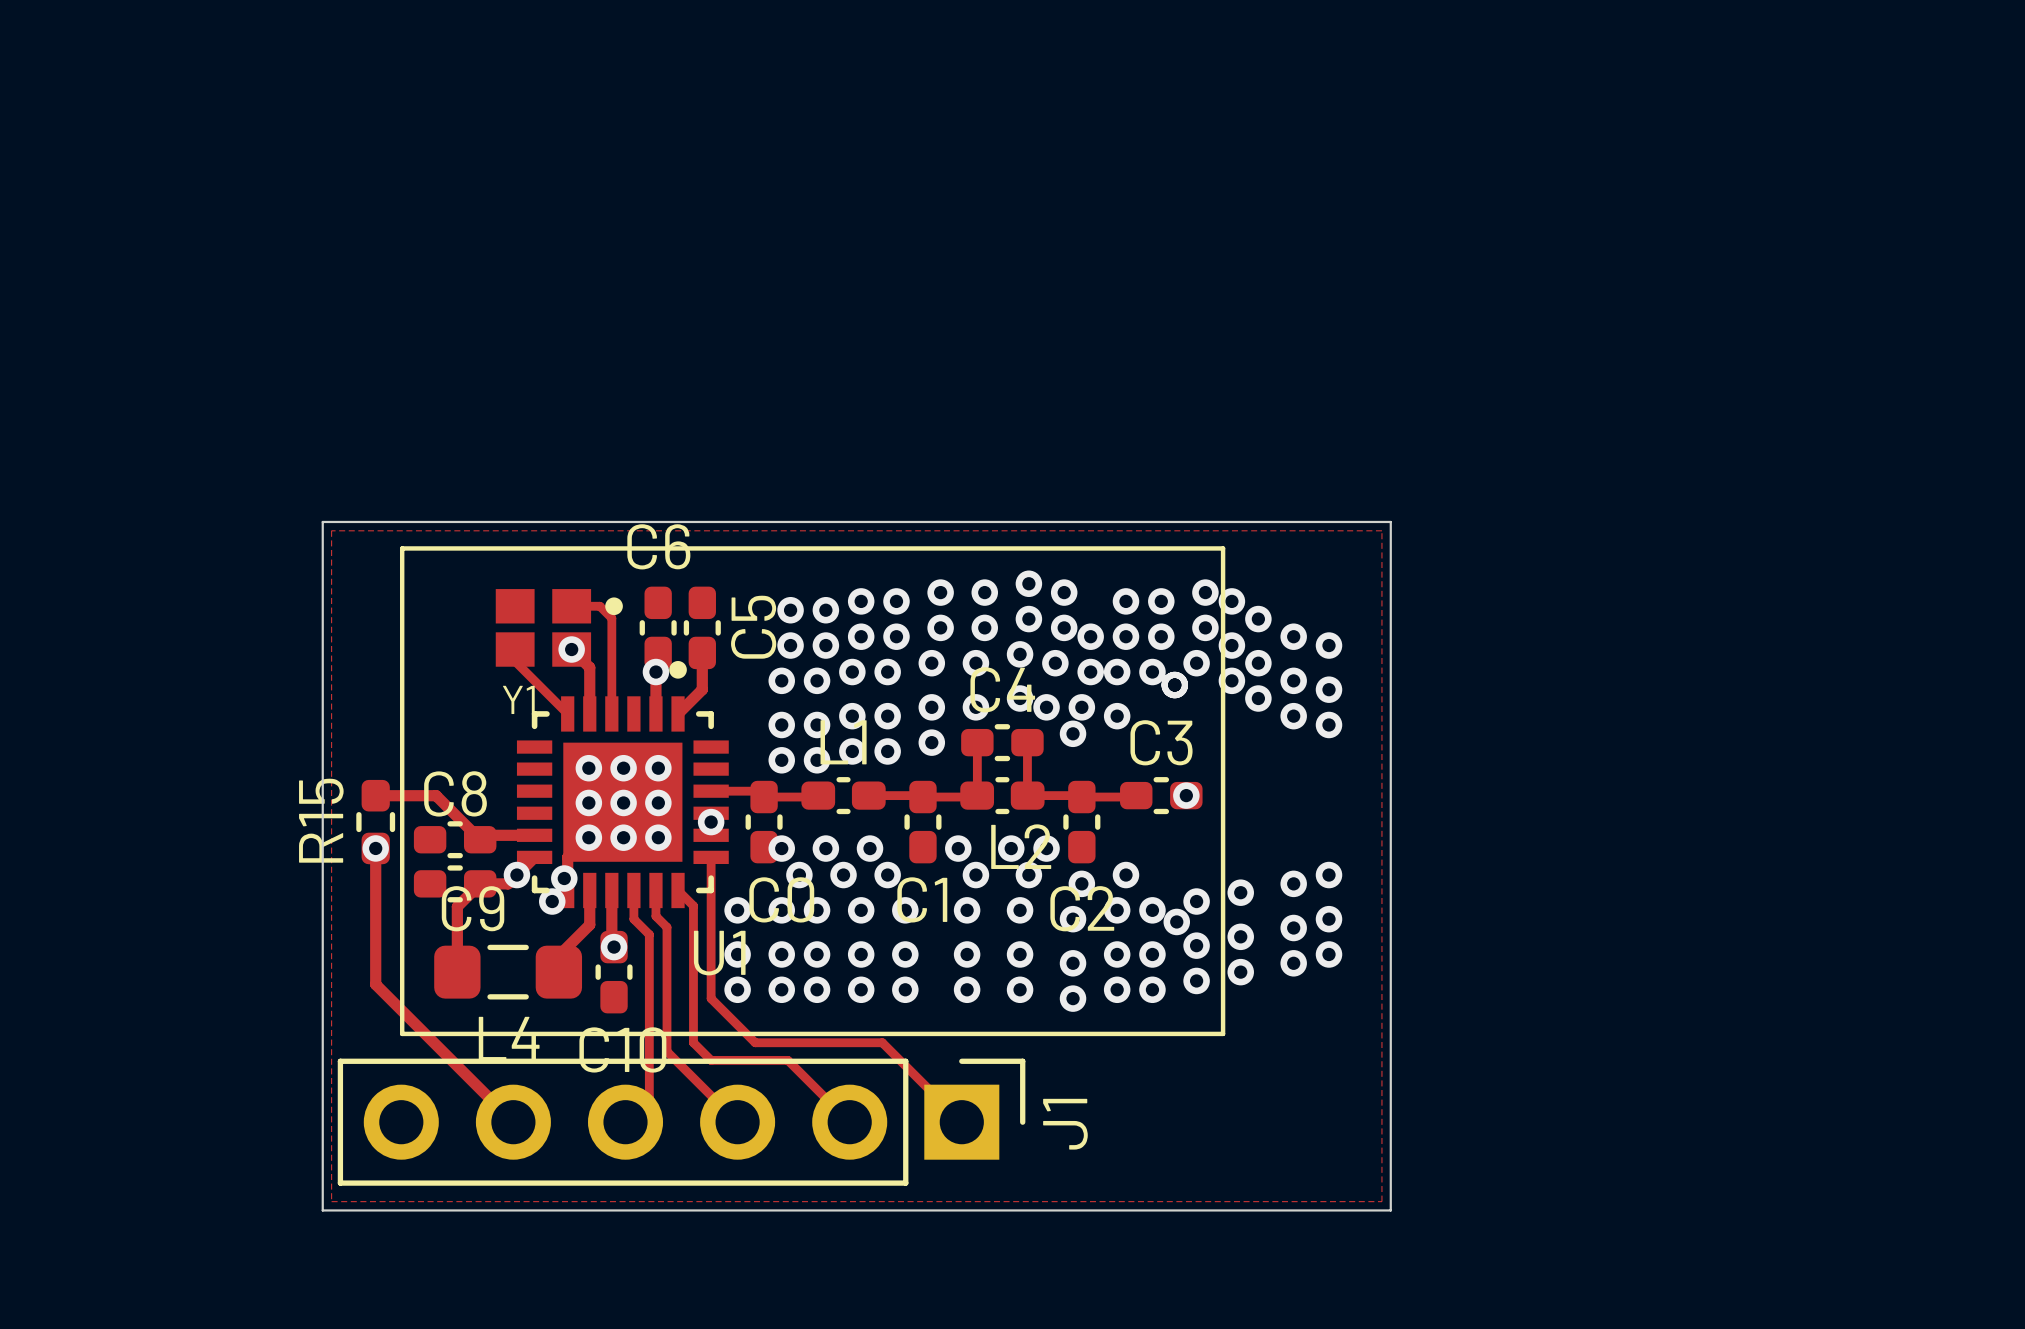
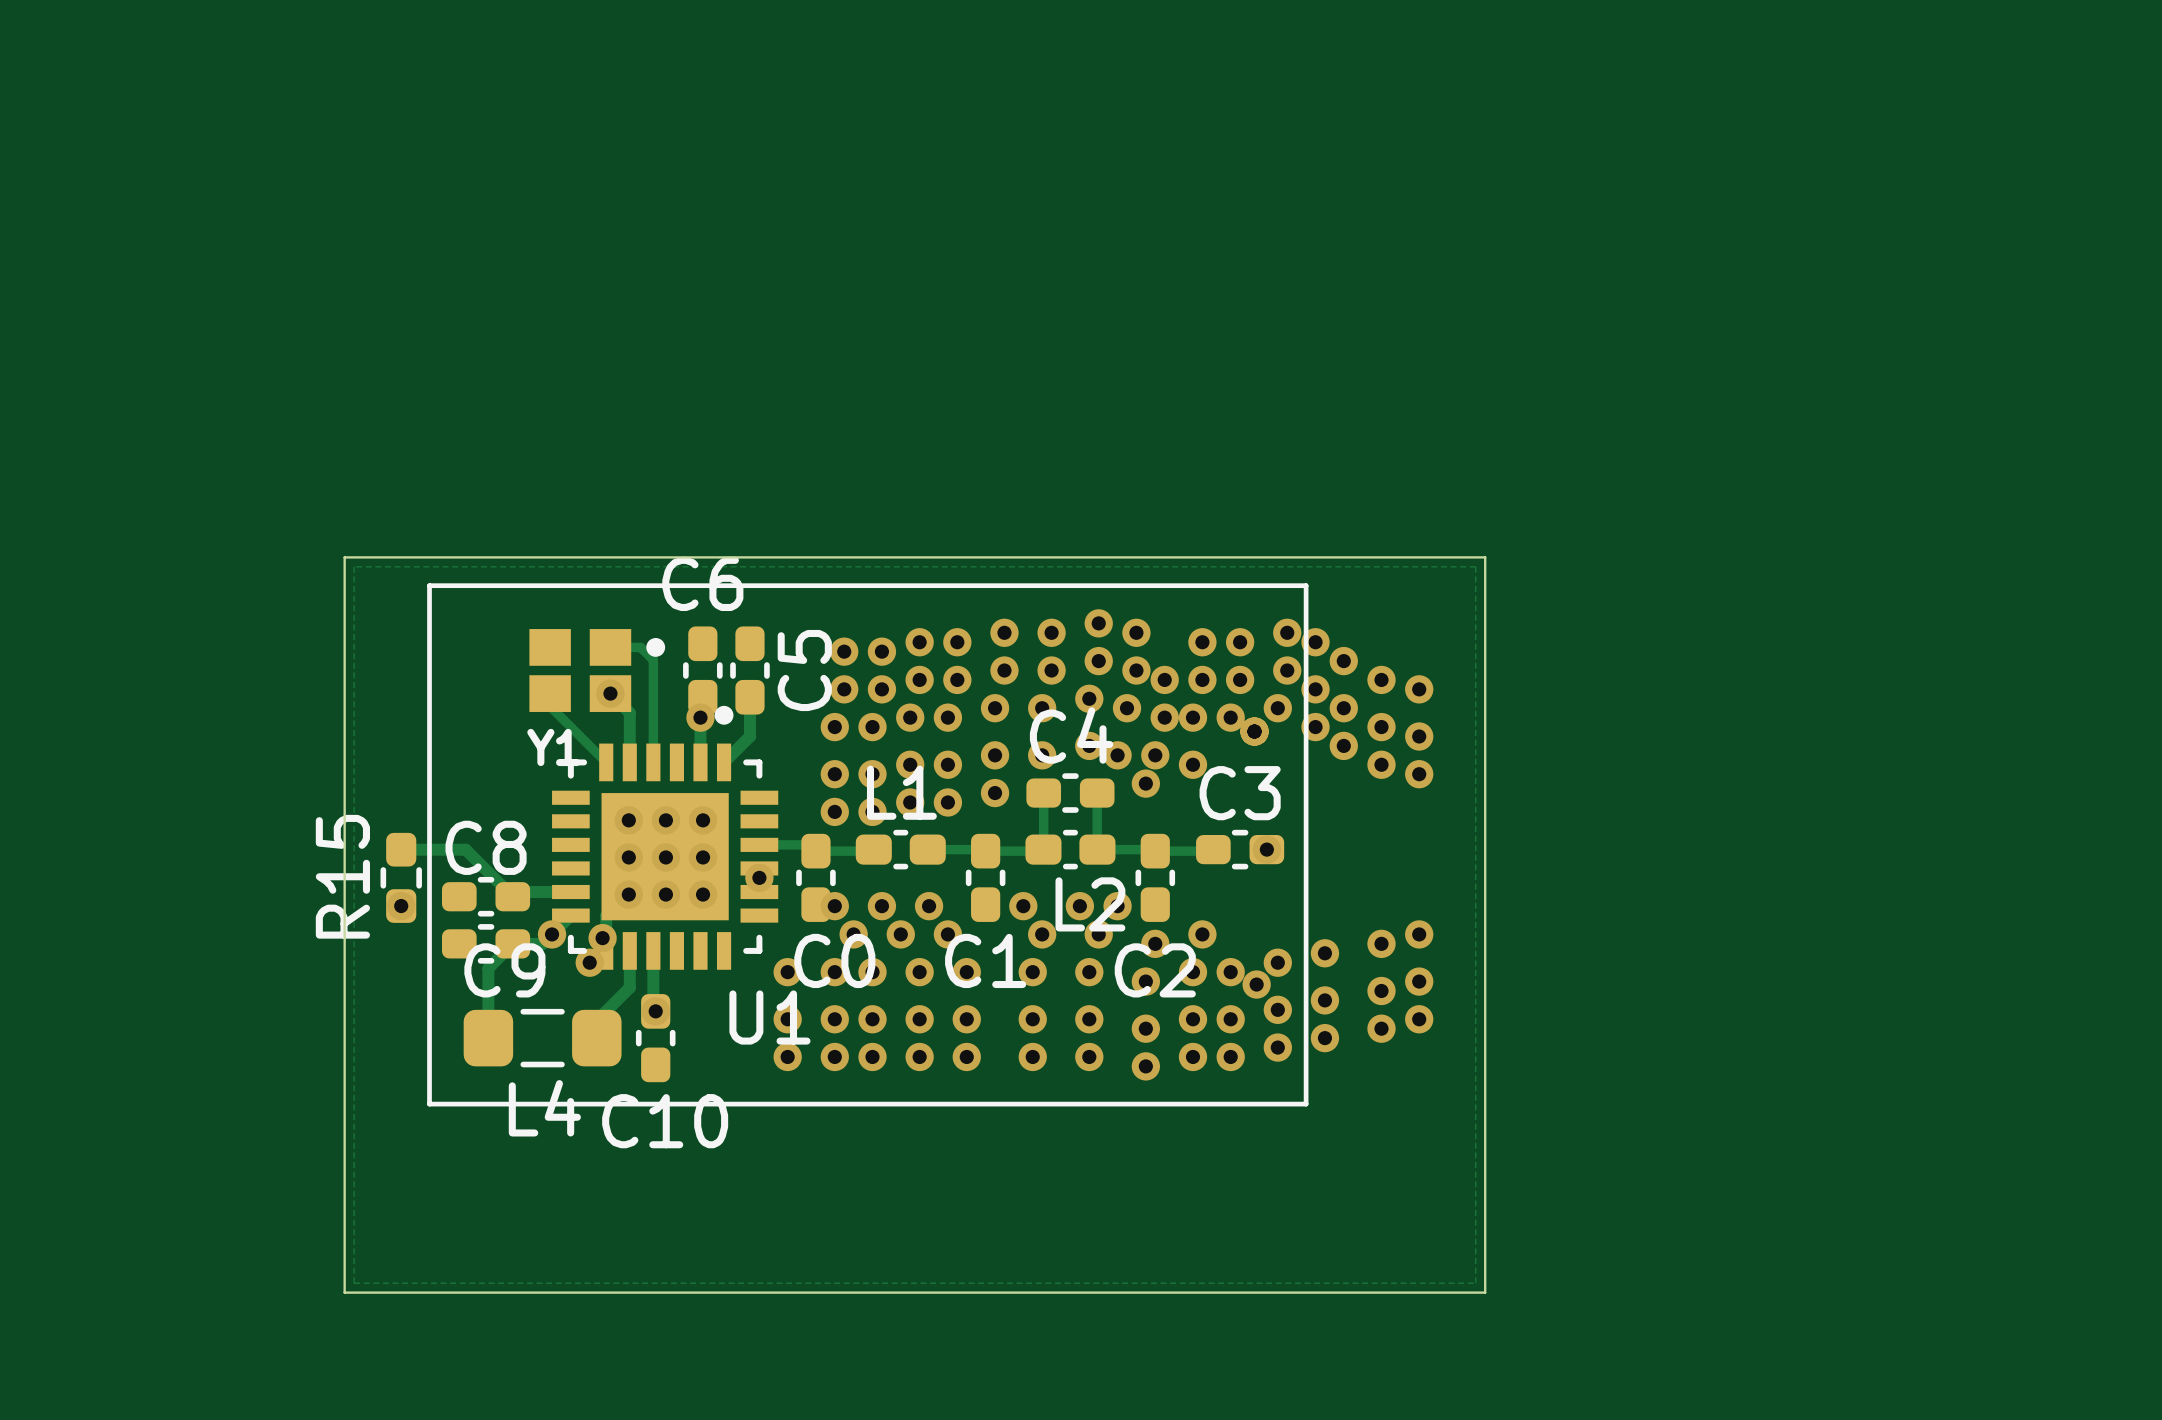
track: (375, 848) (375, 984) (513, 1122) -> none
track: (711, 857) (711, 998) (755, 1042) (882, 1042) (961, 1122) -> none
track: (633, 890) (633, 919) (649, 934) (649, 1098) (625, 1122) -> none
track: (655, 890) (655, 916) (666, 927) (666, 1051) (737, 1122) -> none
track: (678, 890) (693, 905) (693, 1042) (711, 1060) (787, 1060) (849, 1122) -> none
J1: (681, 1122) -> none

